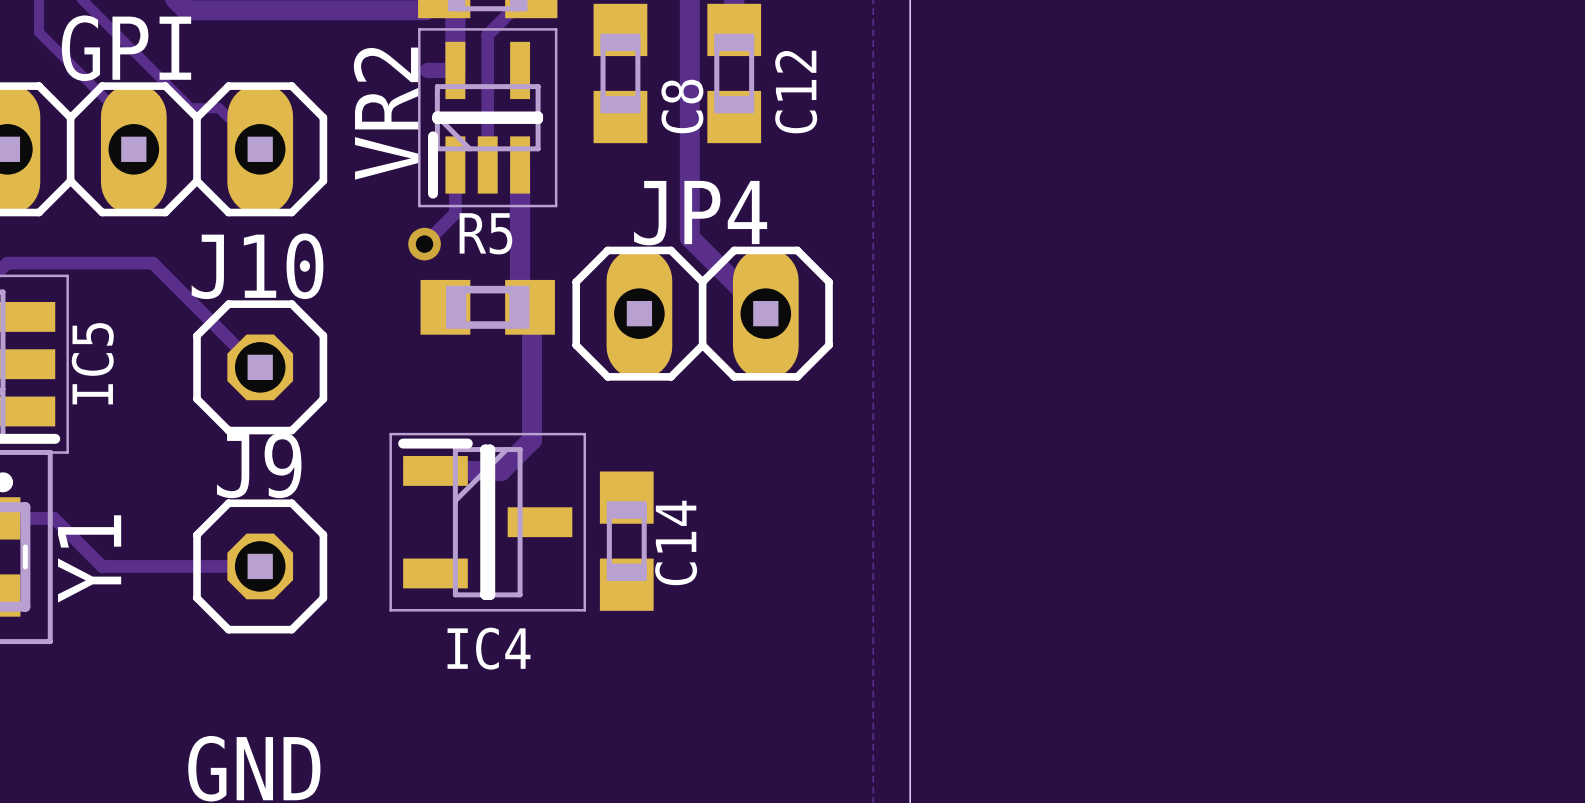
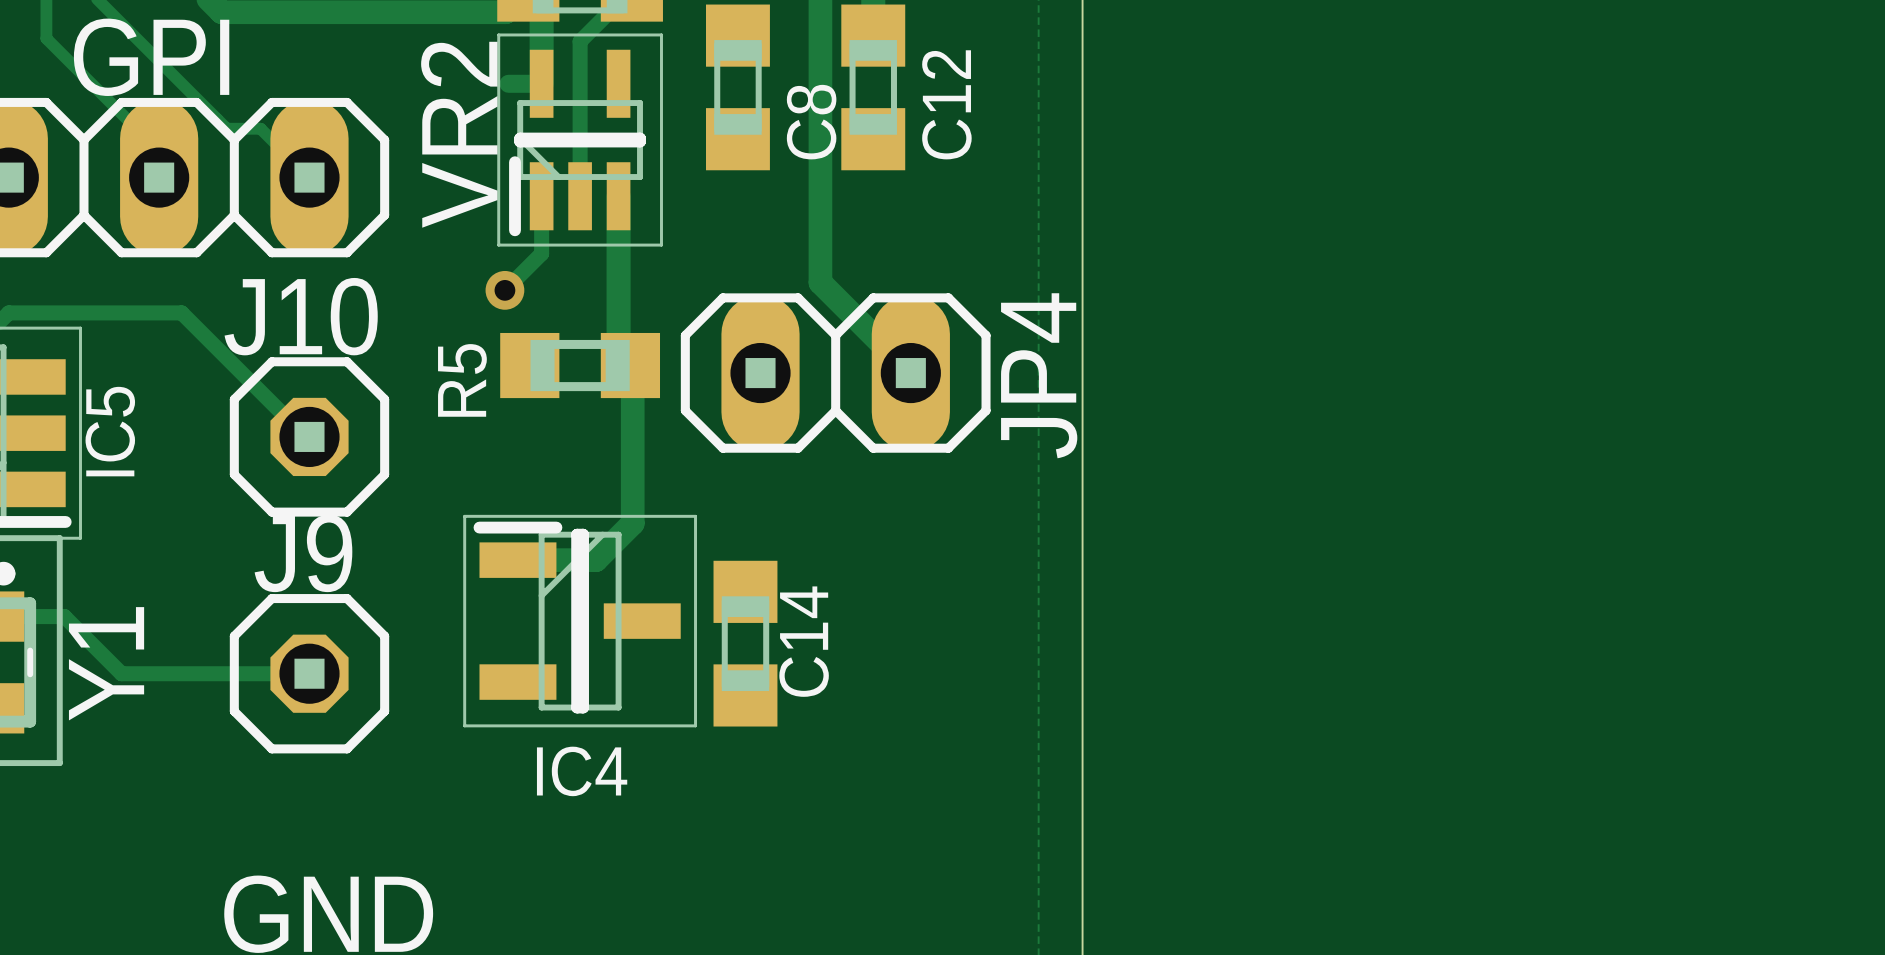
JP4 name rotation: 0° (700, 213) -> 90° counterclockwise (1039, 375)
JP4 name position: JP4 (700, 213) -> JP4 (1039, 375)
R5 name rotation: 0° (485, 233) -> 90° counterclockwise (462, 380)
R5 name position: R5 (485, 233) -> R5 (462, 380)

